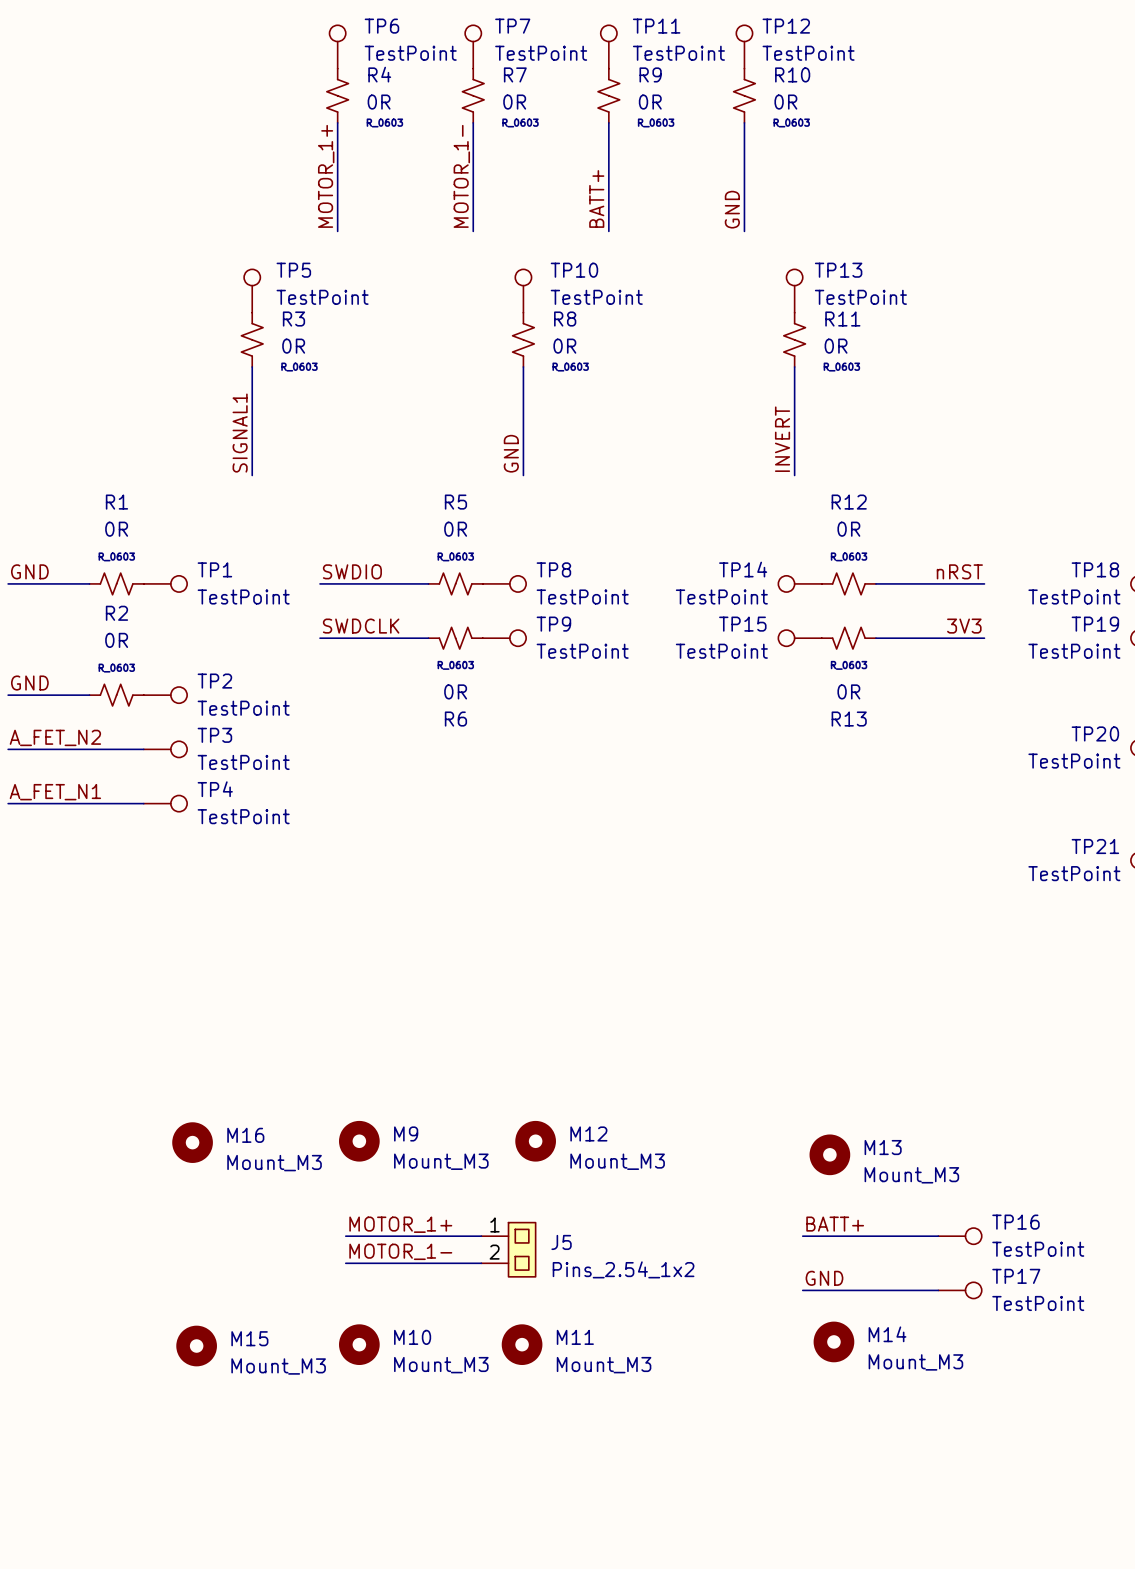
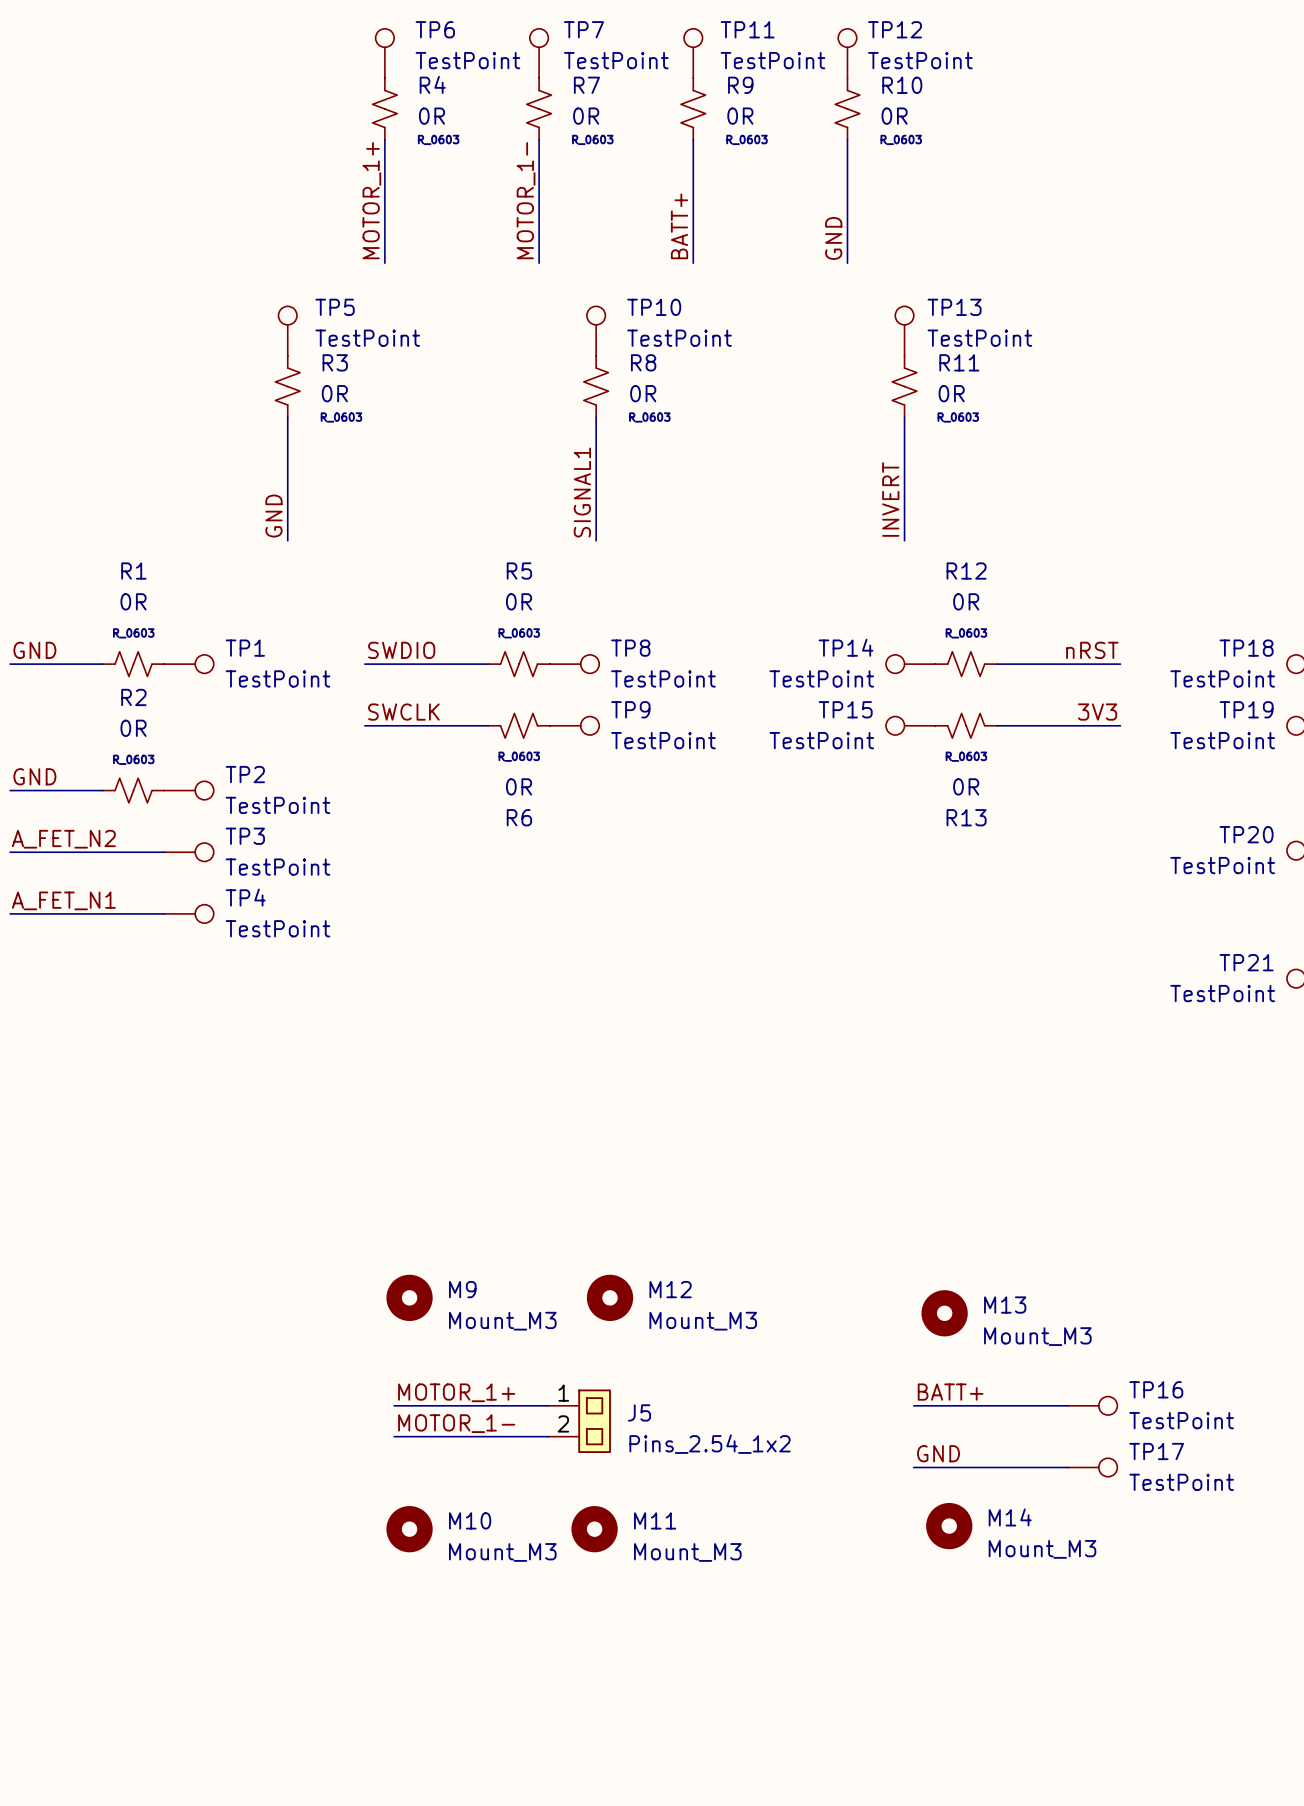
label: SIGNAL1 (240, 433) -> GND (273, 516)
label: GND (511, 453) -> SIGNAL1 (582, 492)
label: SWDCLK (361, 626) -> SWCLK (403, 712)
M16: Mount_M3 (192, 1142) -> none
M15: Mount_M3 (196, 1346) -> none

